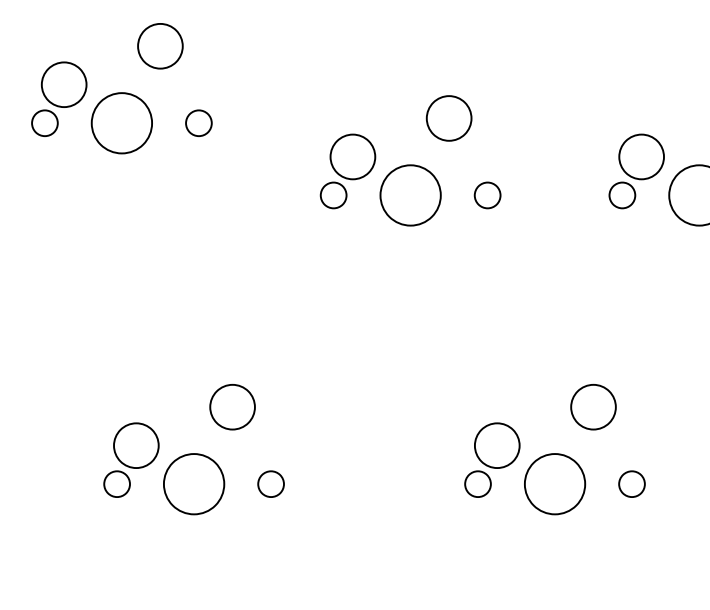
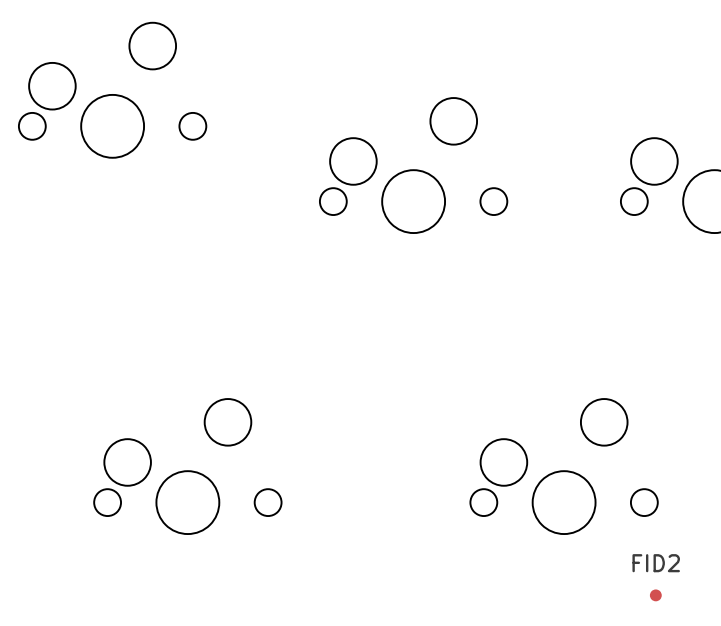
FID2: none -> (655, 595)

